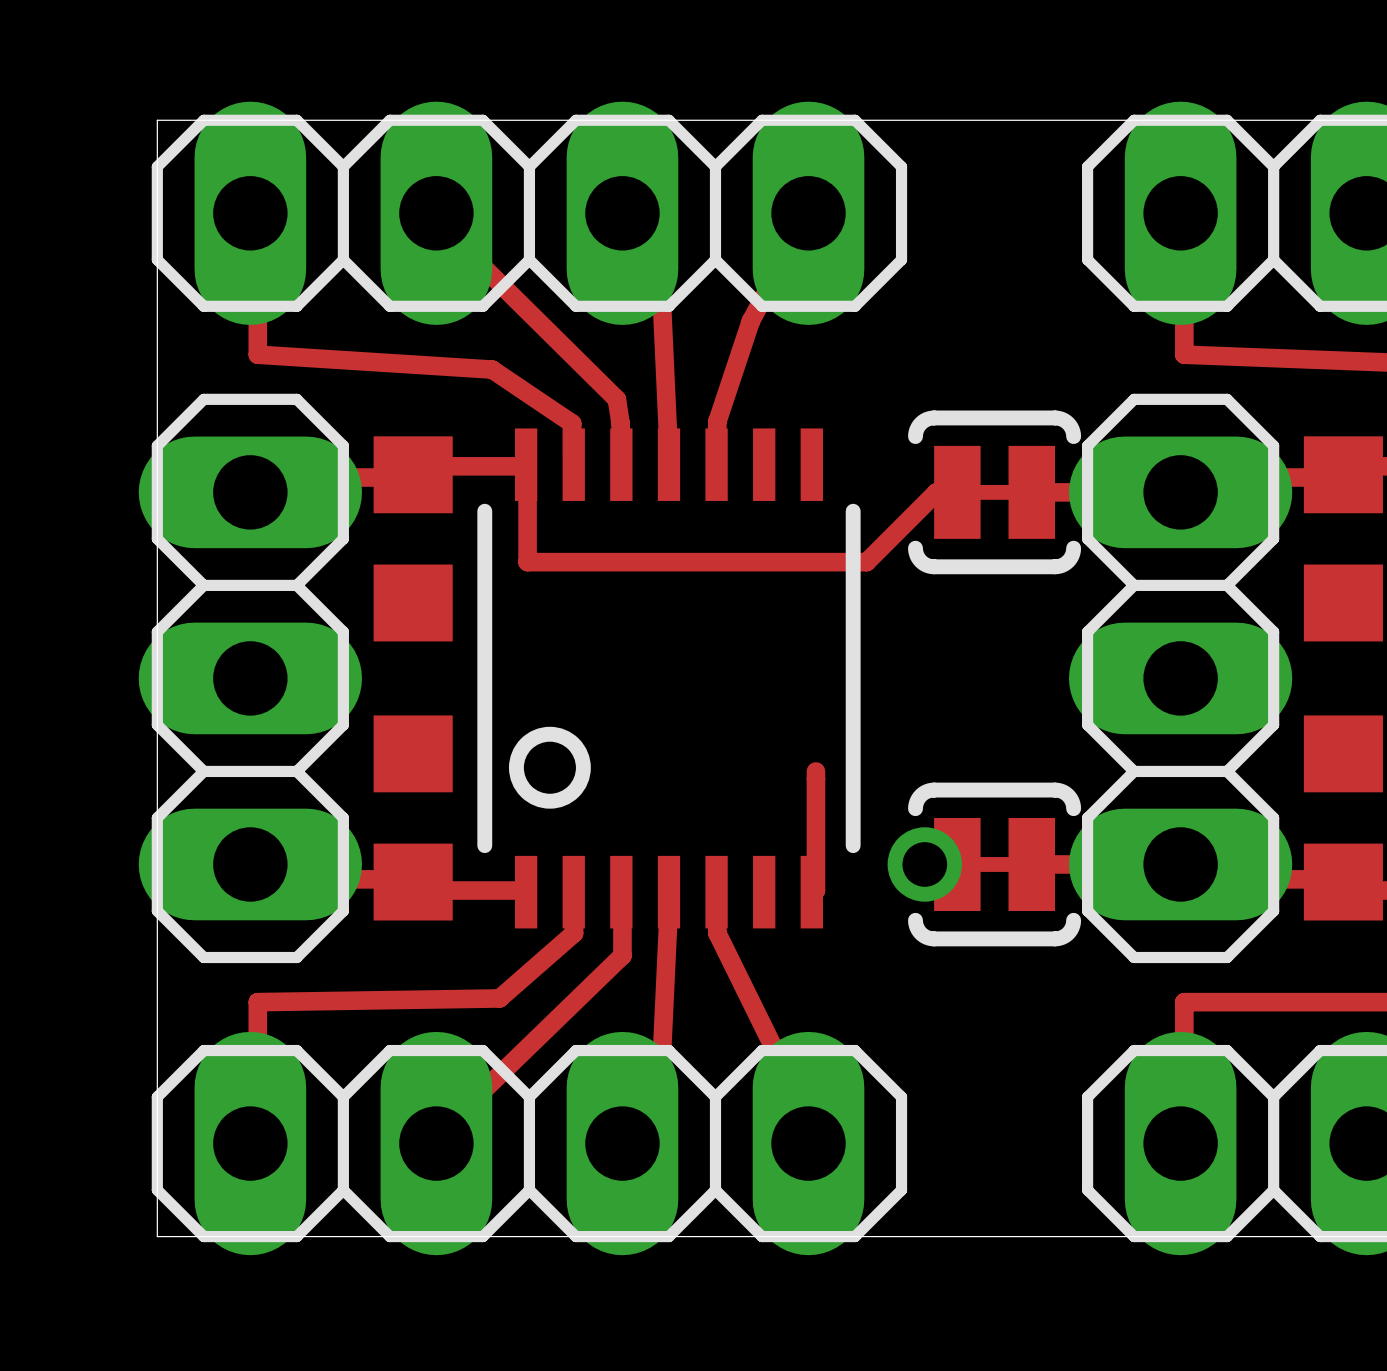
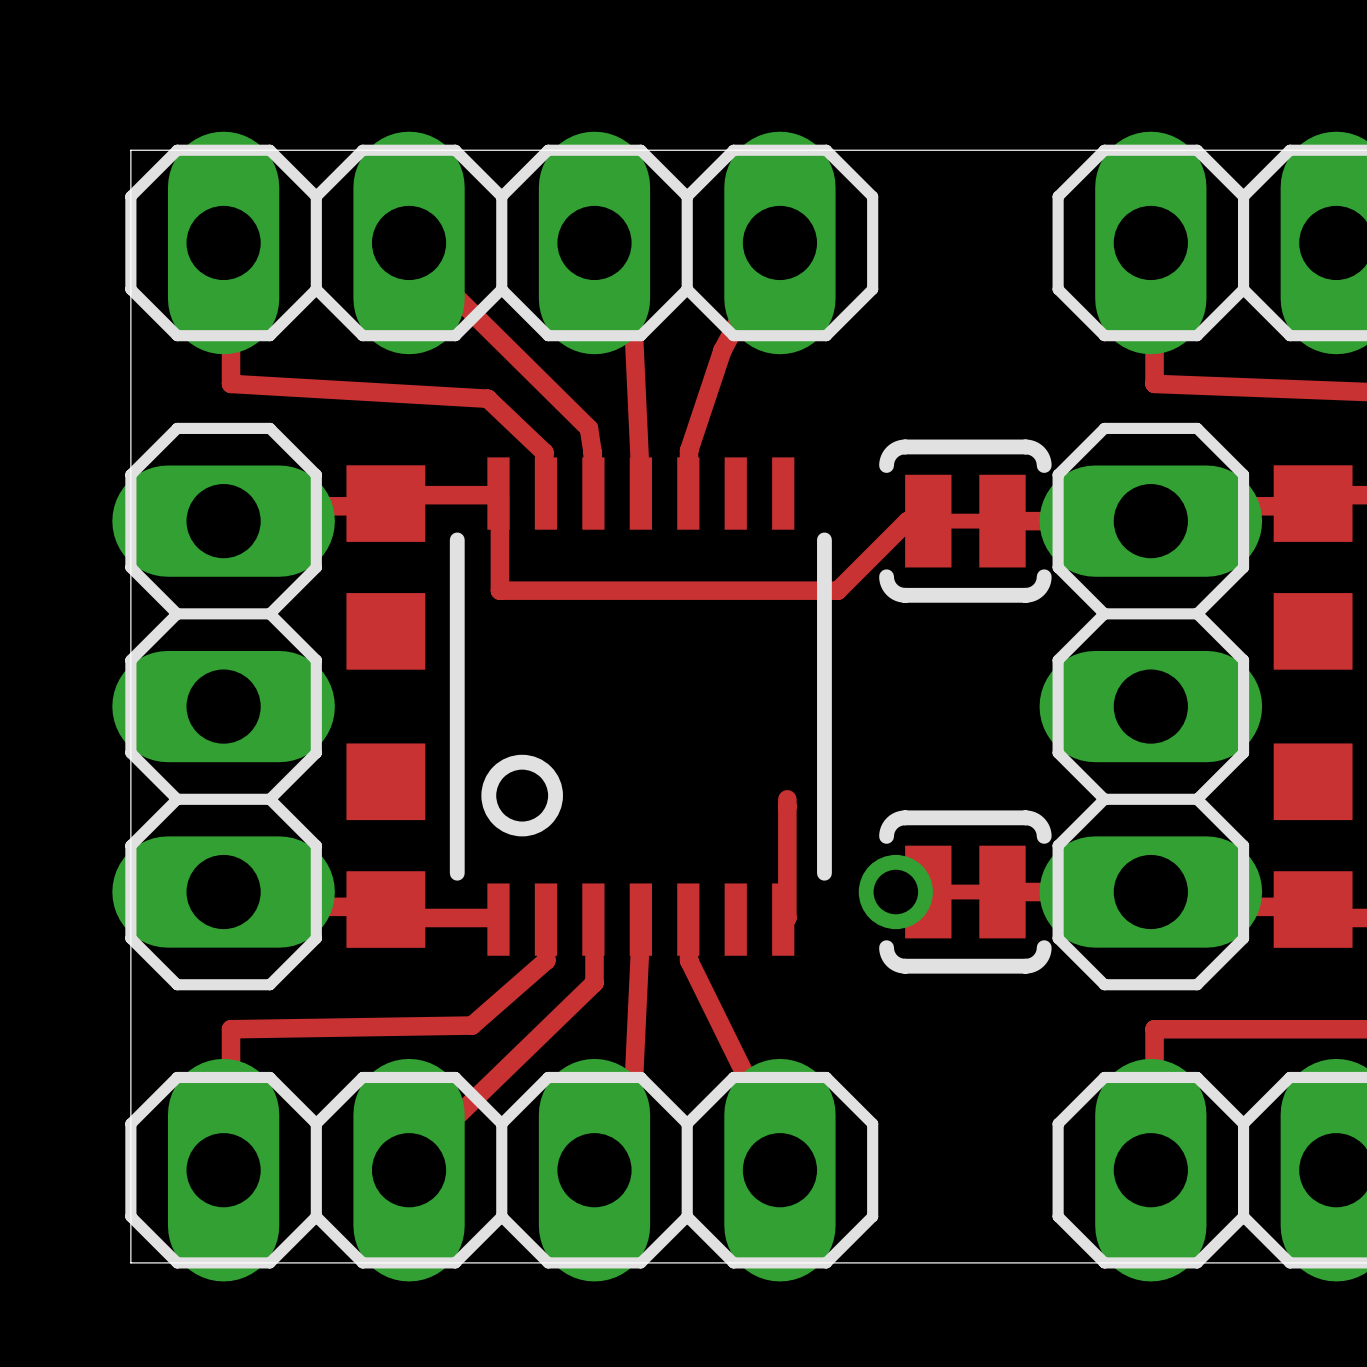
track: (257, 354) (492, 369) (572, 423) -> (231, 383) (487, 398) (544, 452)

